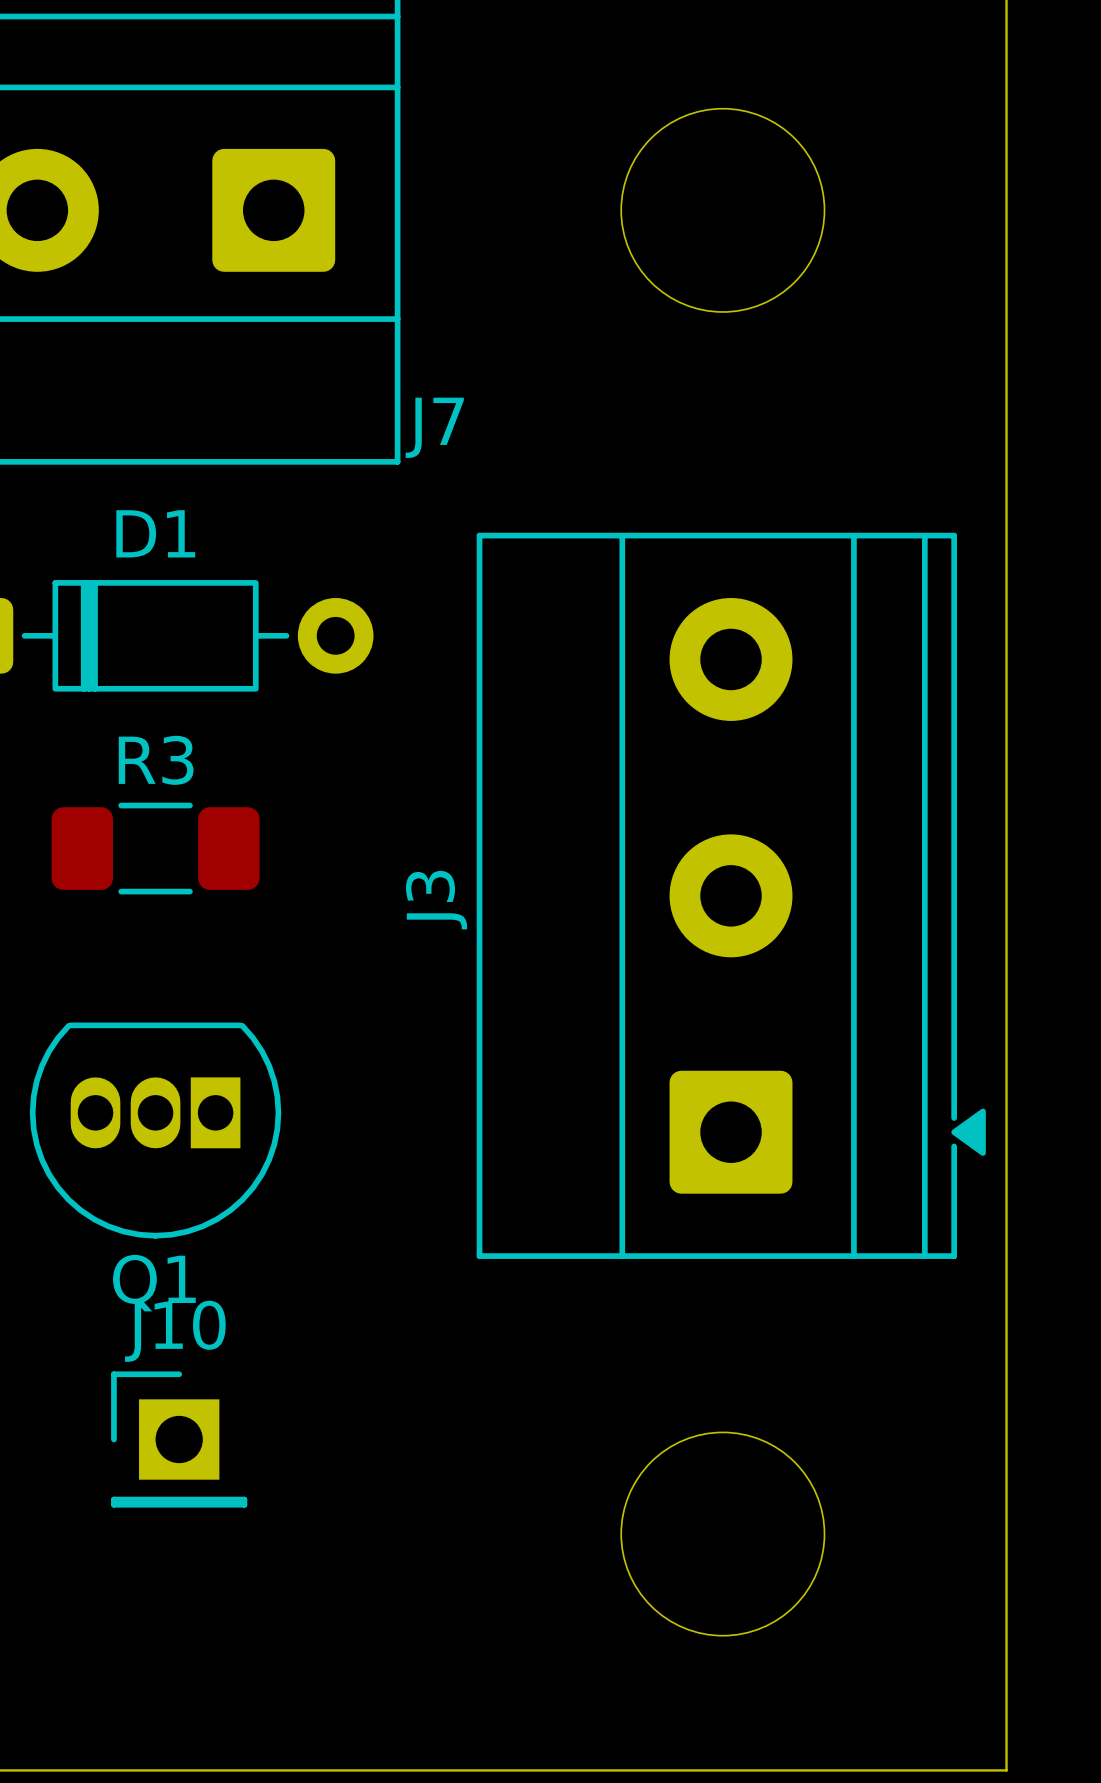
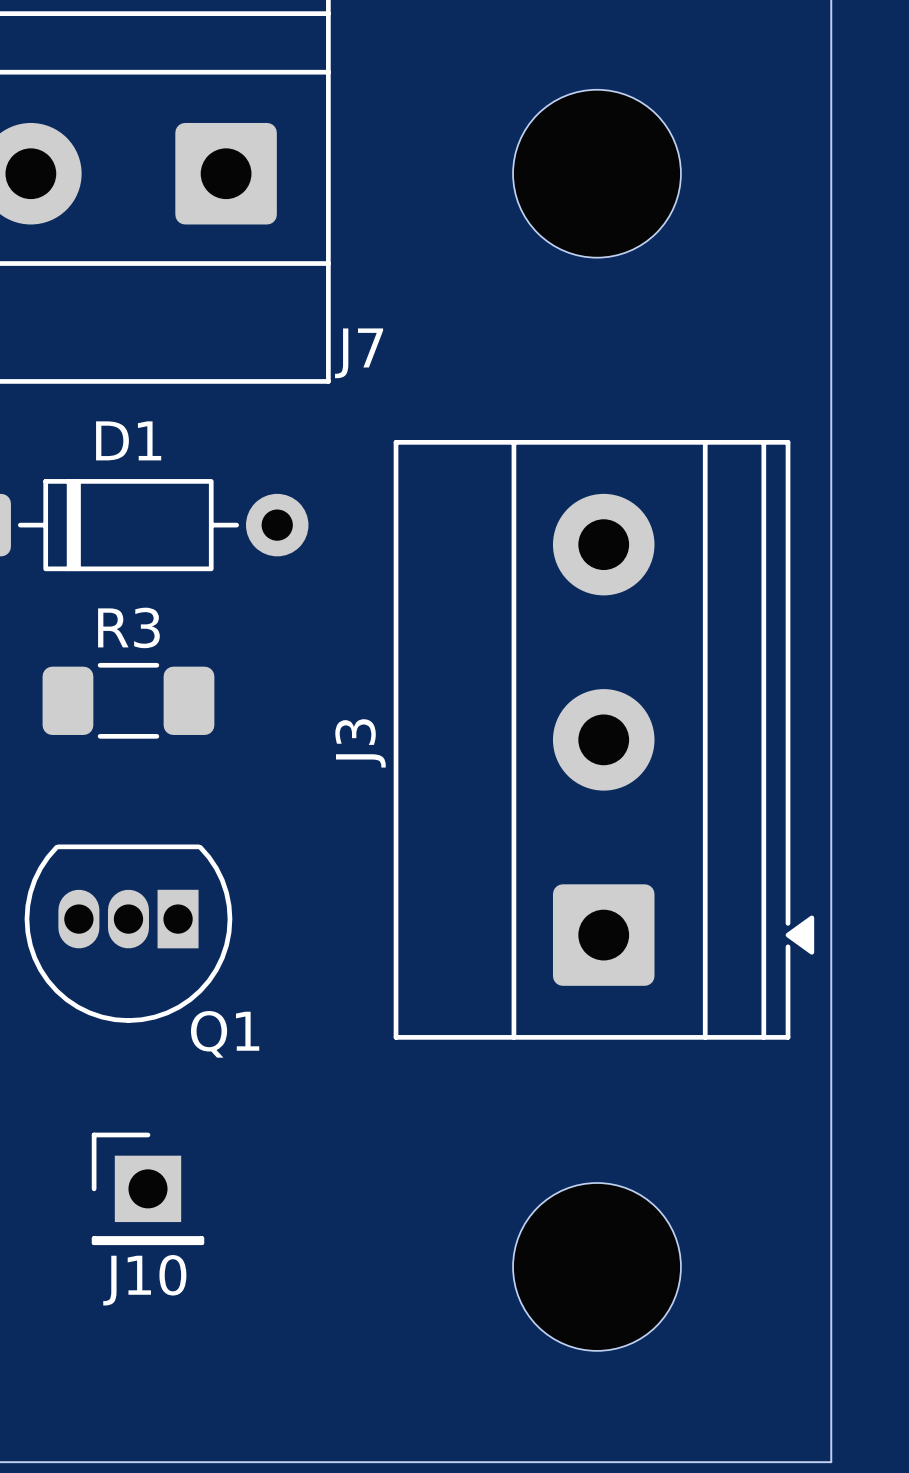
Q1 name position: Q1 (154, 1283) -> Q1 (225, 1034)
J10 name position: J10 (175, 1331) -> J10 (144, 1280)

